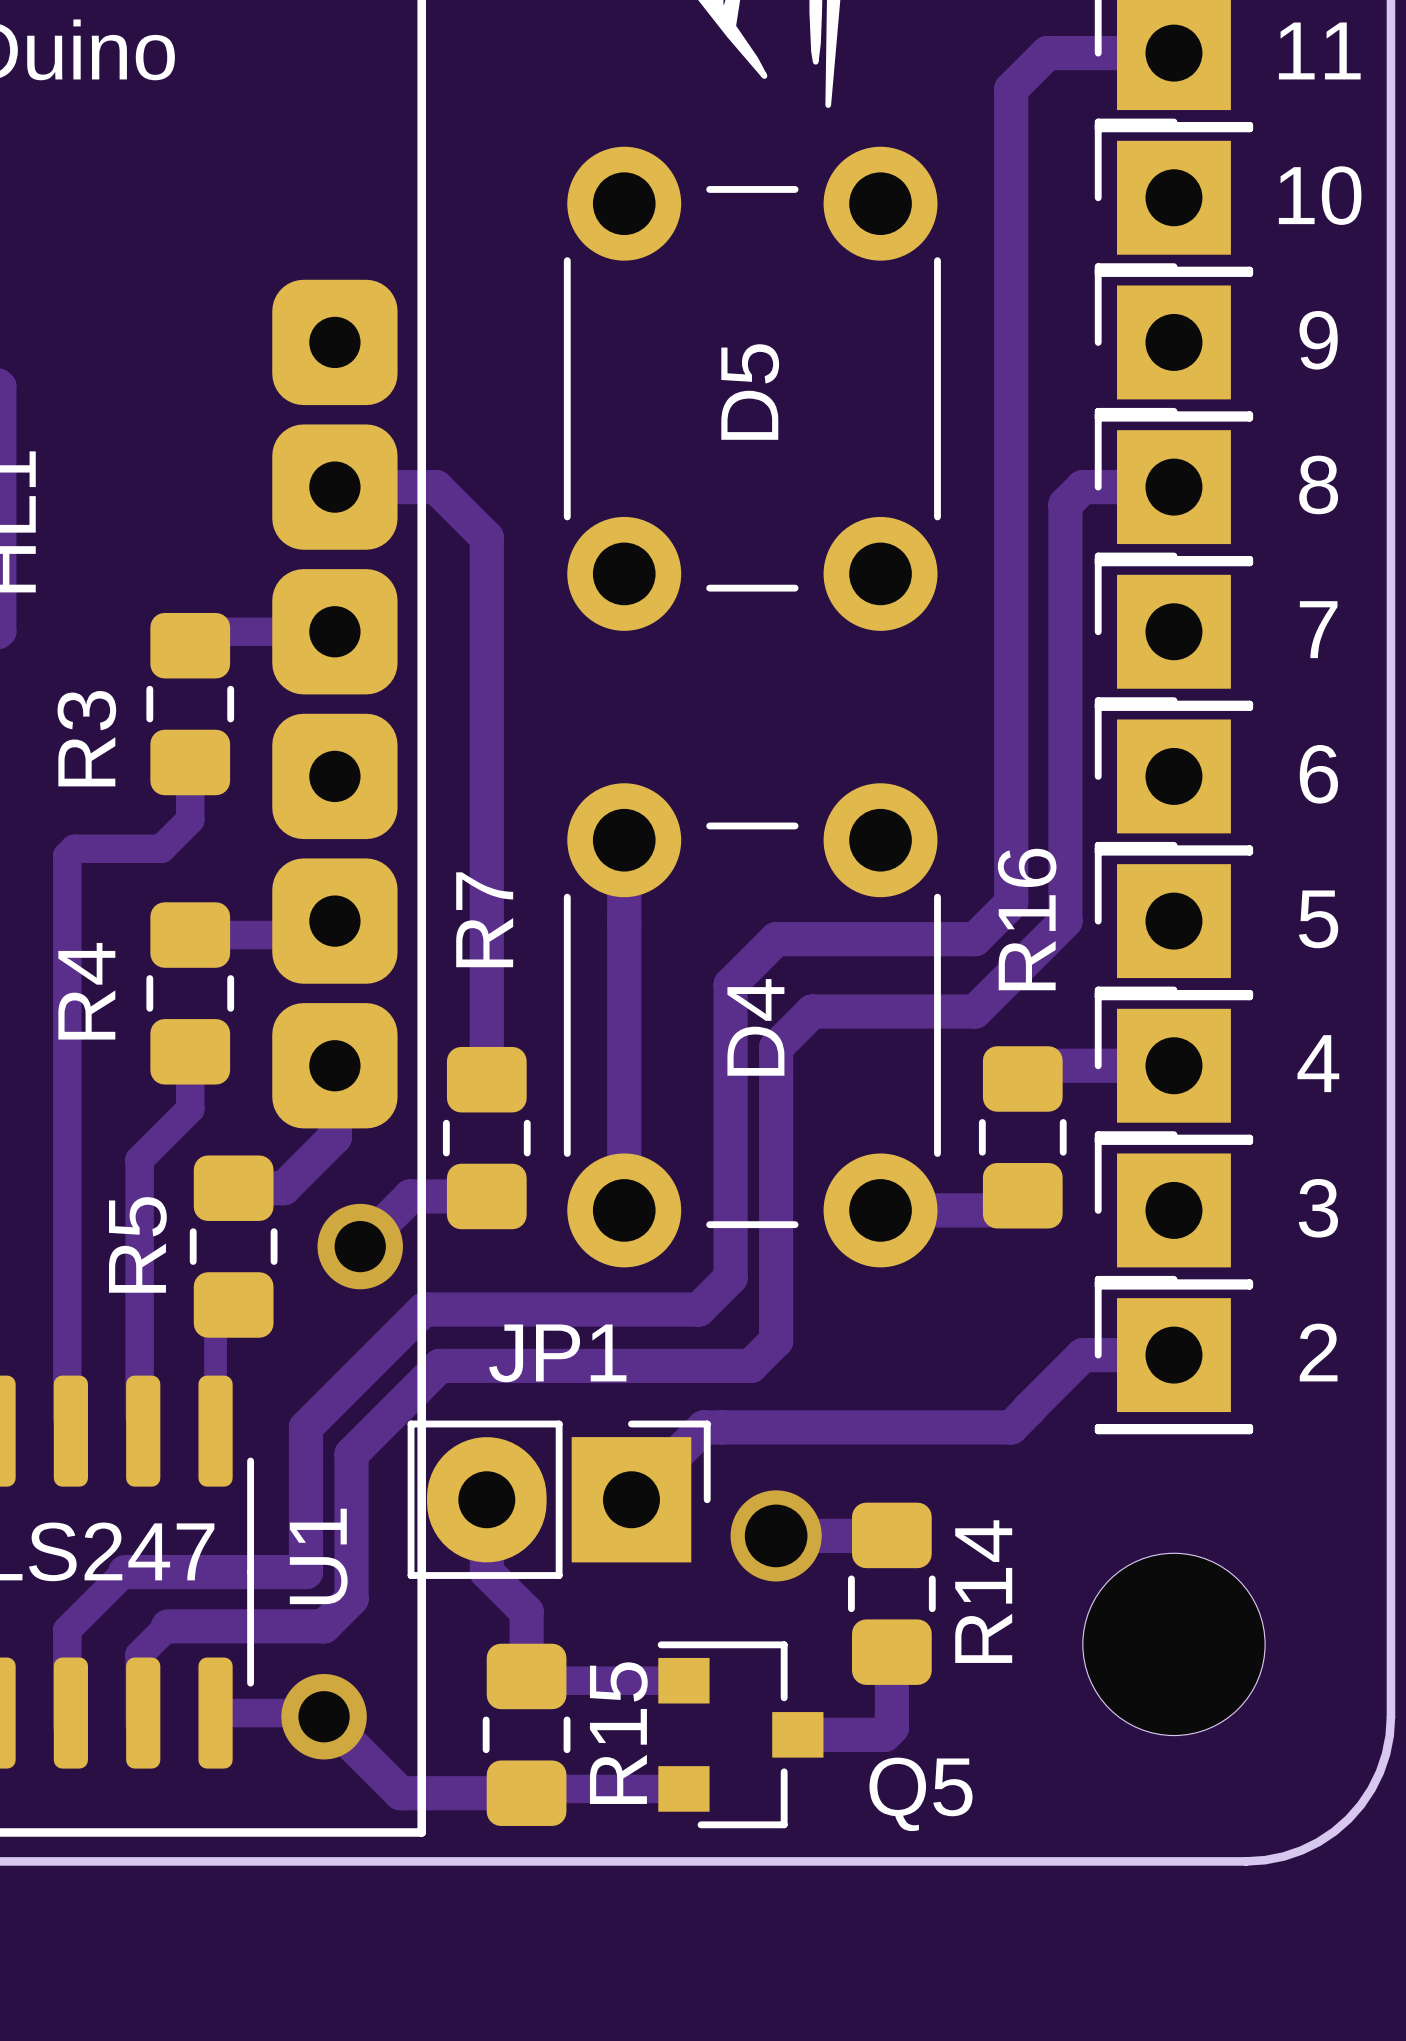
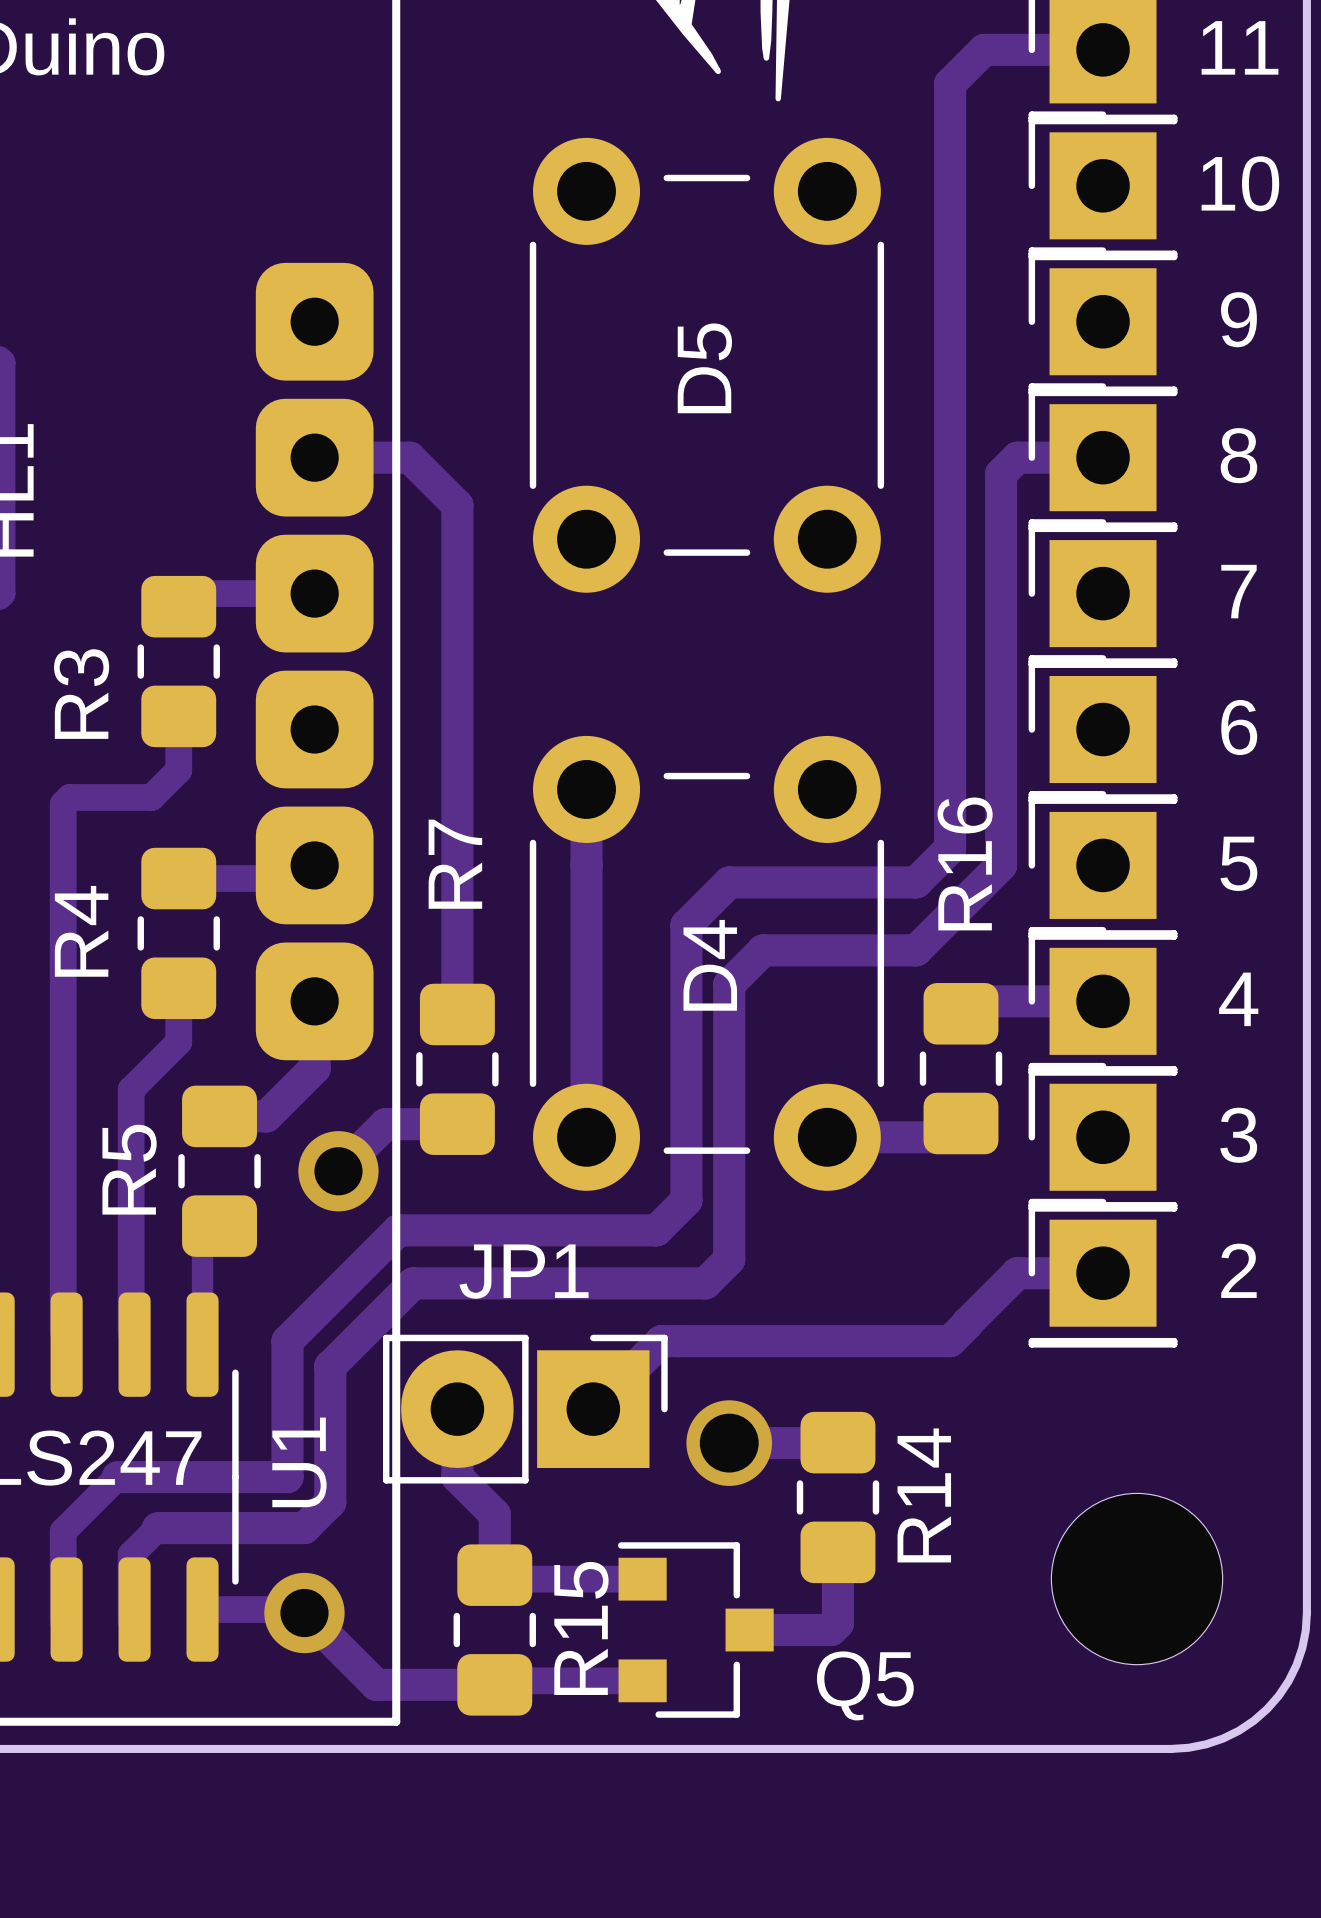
part position: (1173, 1644) -> (1137, 1579)

